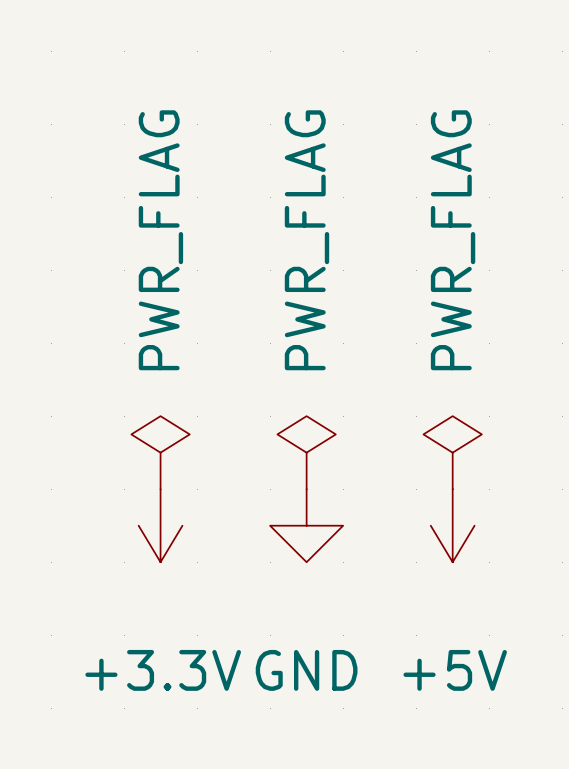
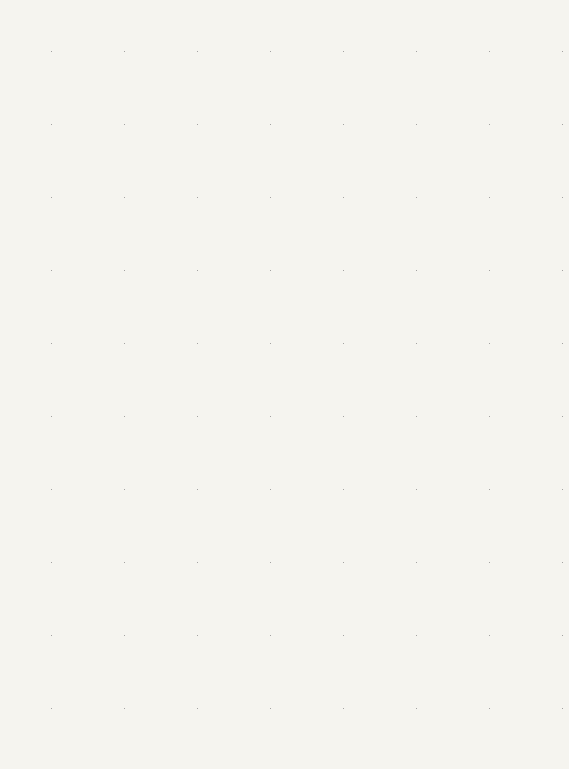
power symbol: PWR_FLAG (160, 452) -> none
power symbol: PWR_FLAG (306, 452) -> none
power symbol: PWR_FLAG (452, 452) -> none
power symbol: +3.3V (160, 525) -> none
power symbol: GND (306, 525) -> none
power symbol: +5V (452, 525) -> none

